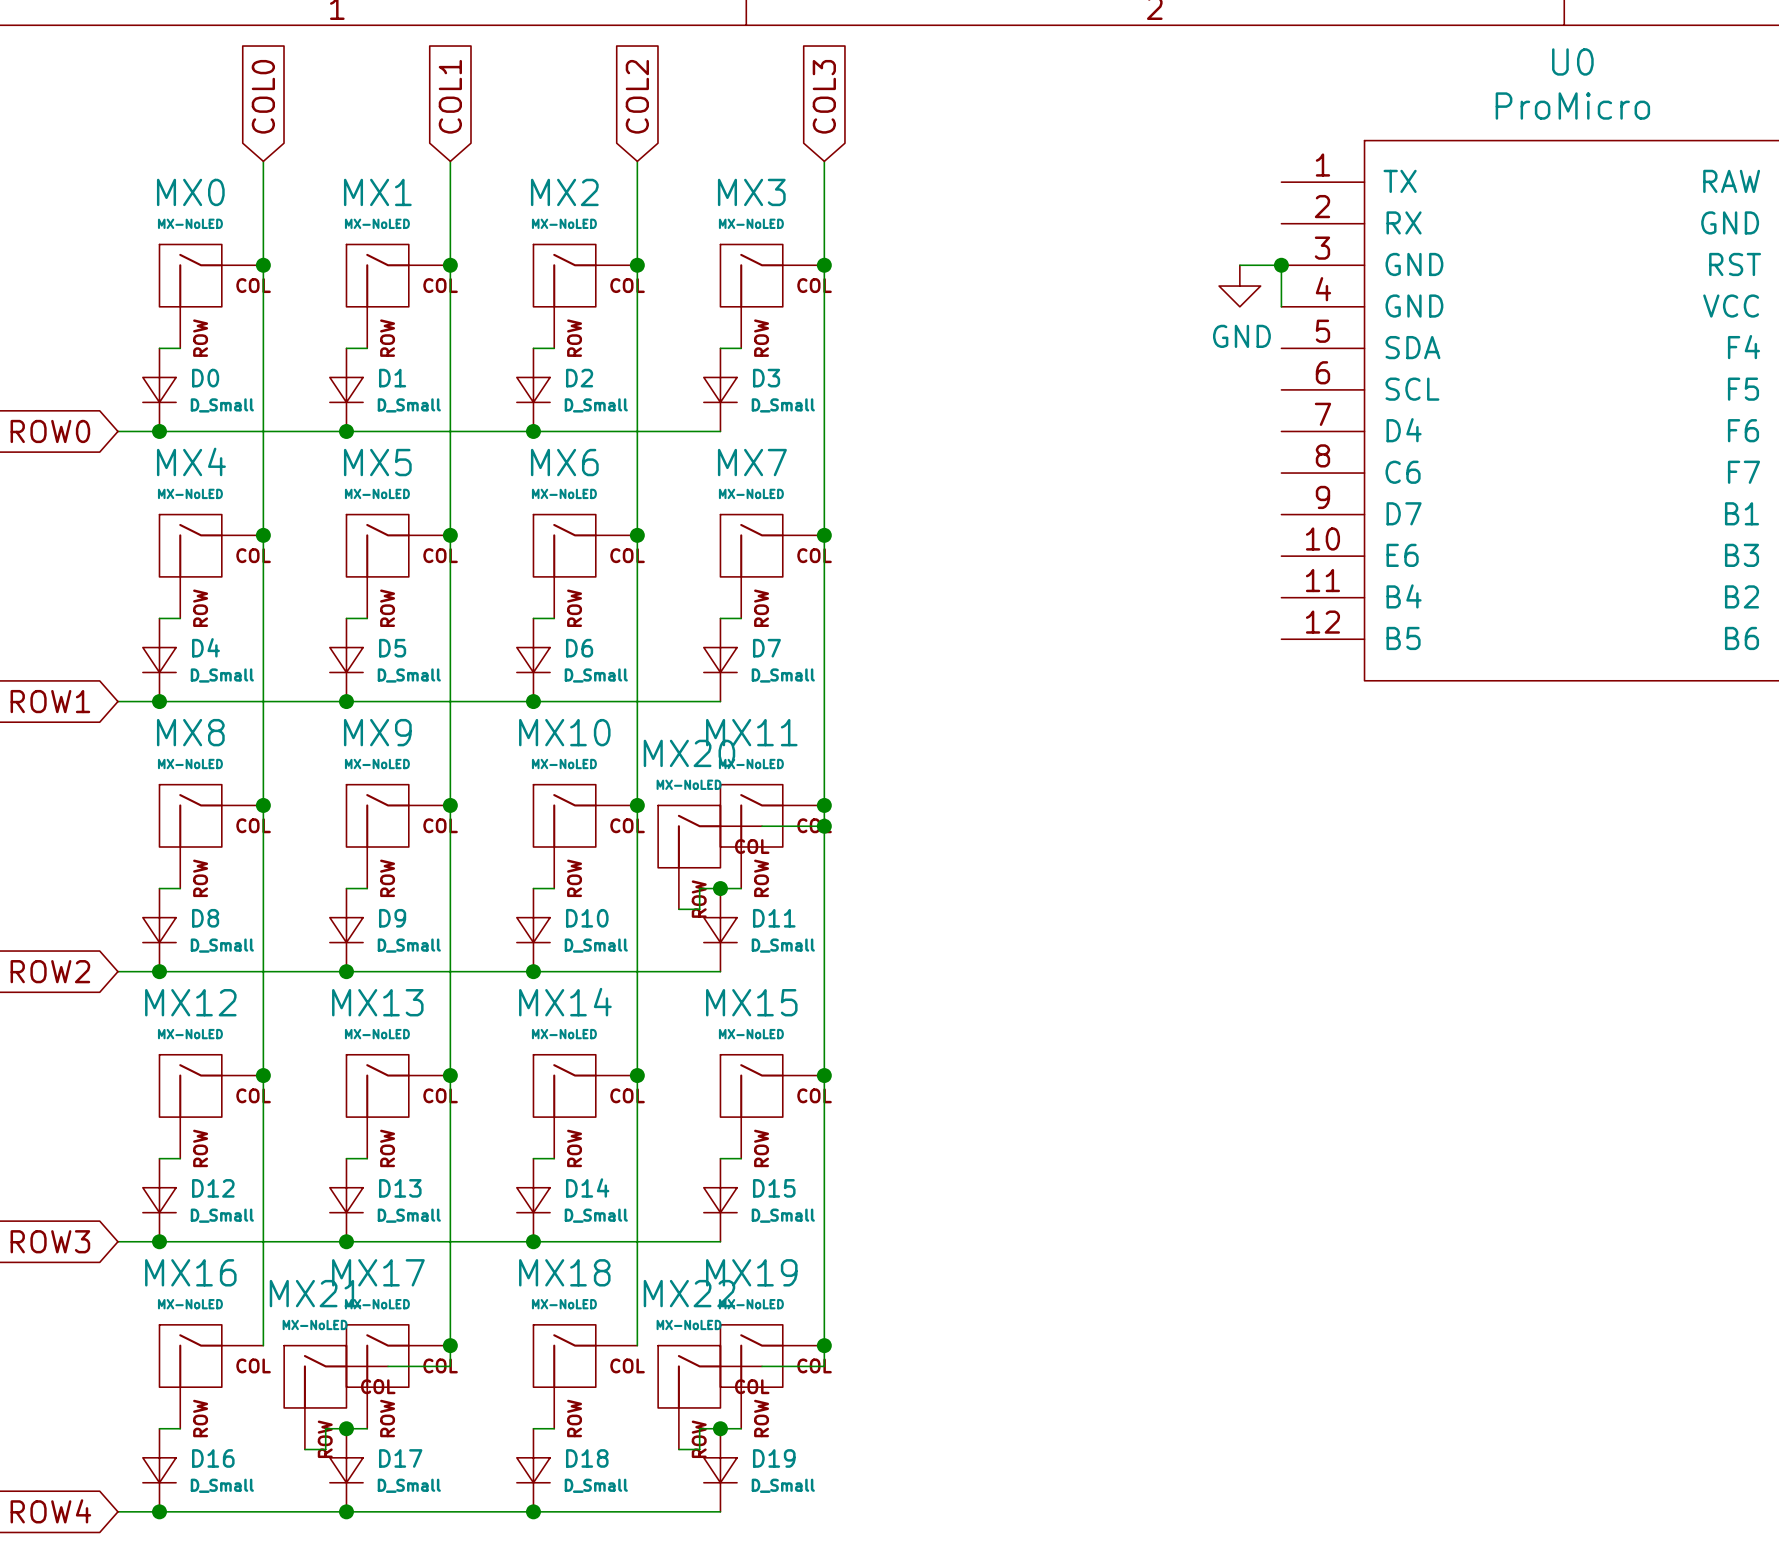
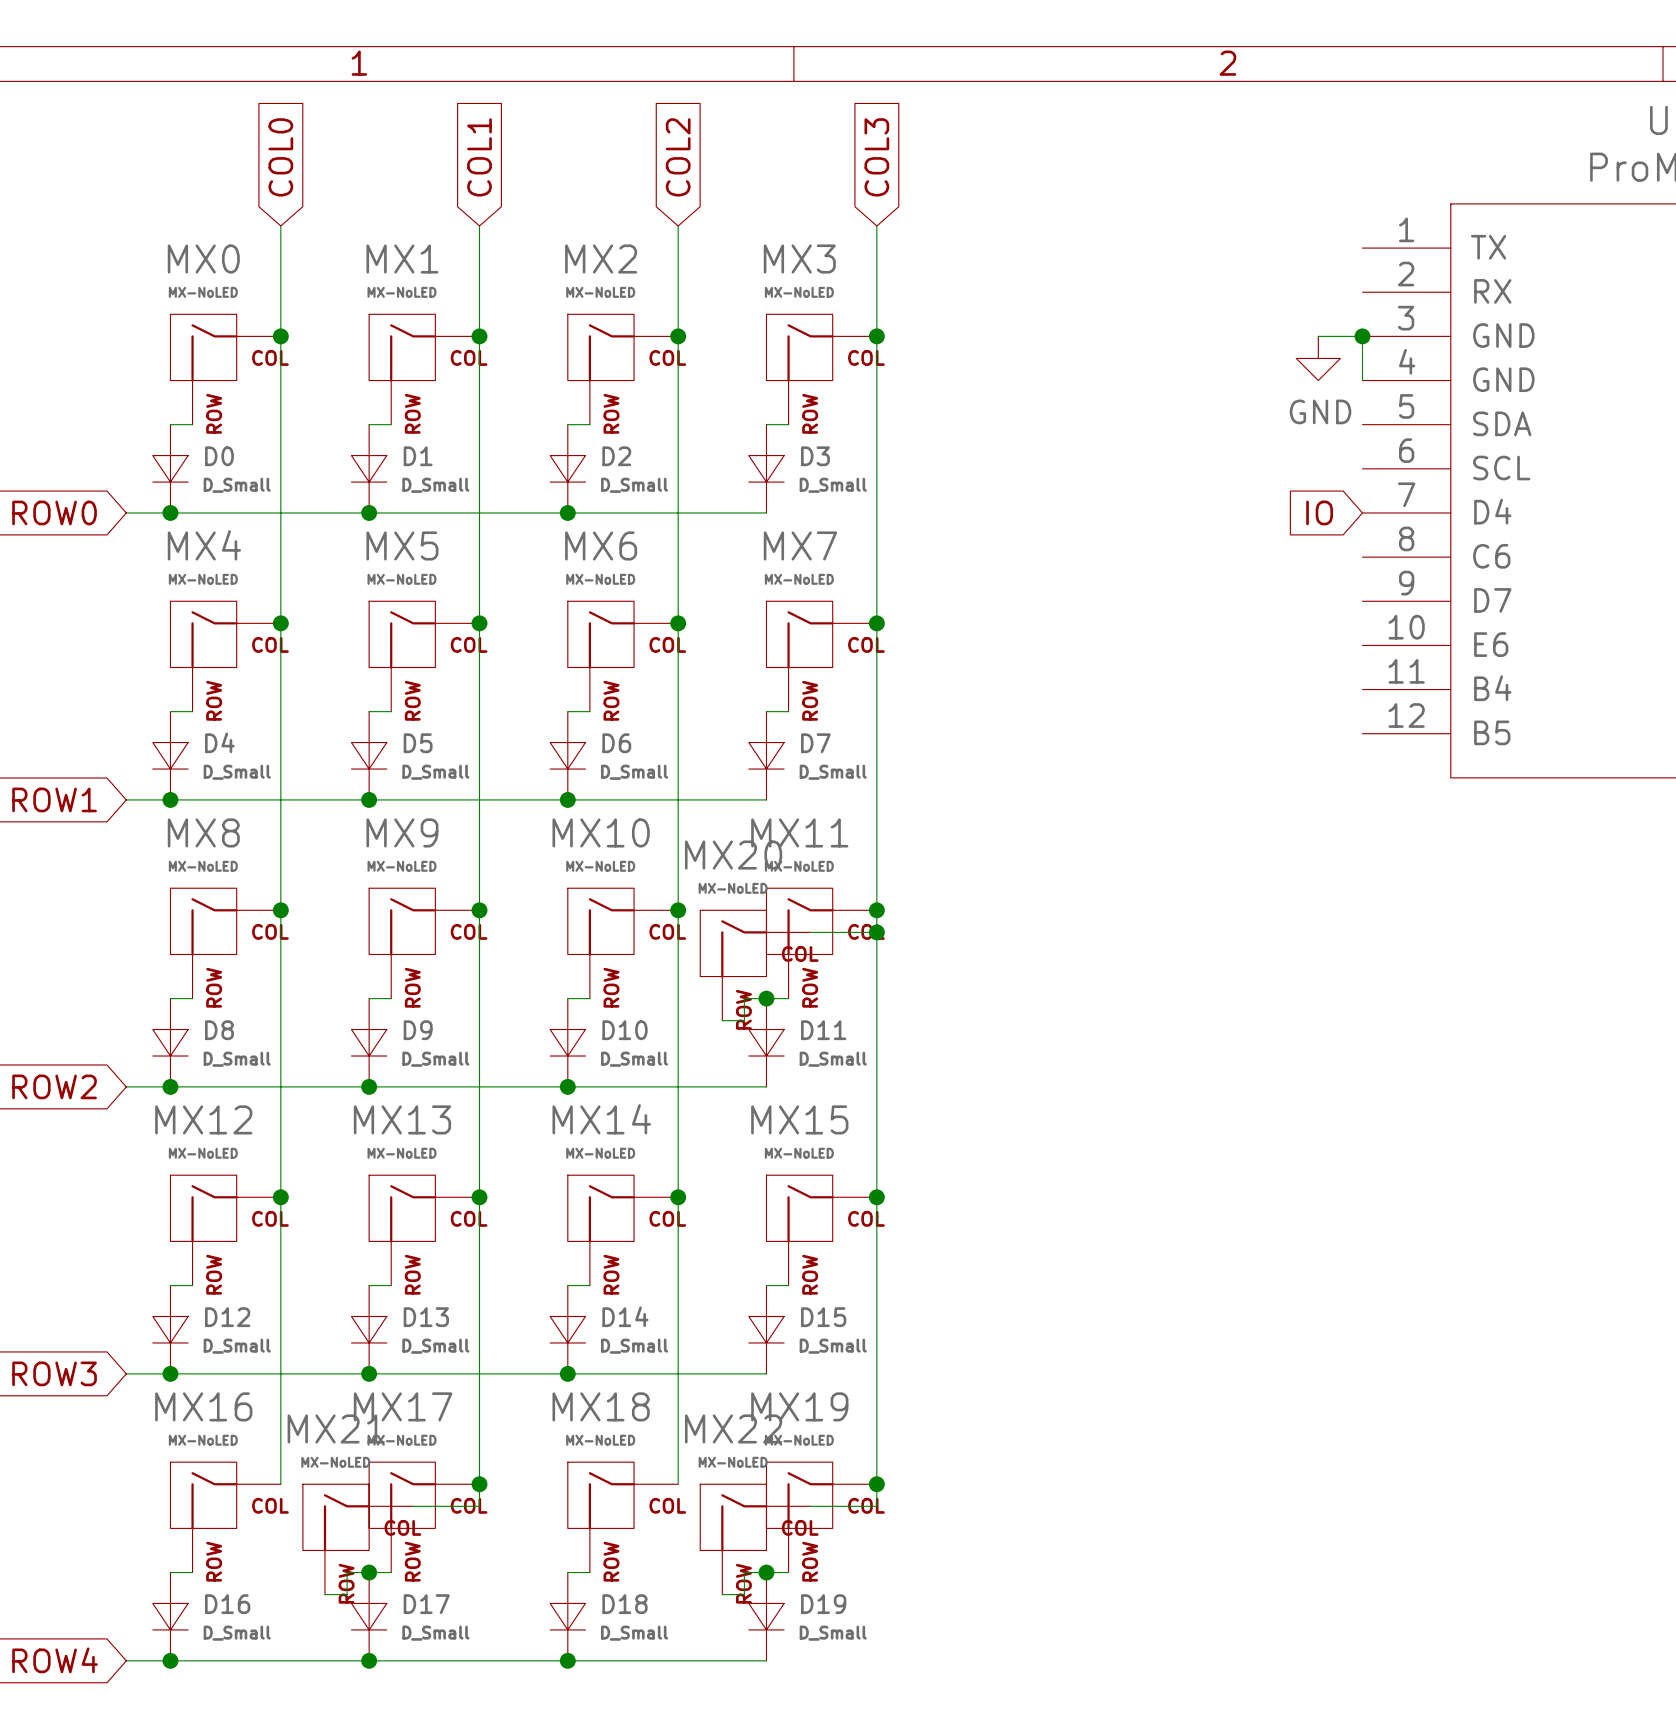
global label: none -> IO (1319, 512)

